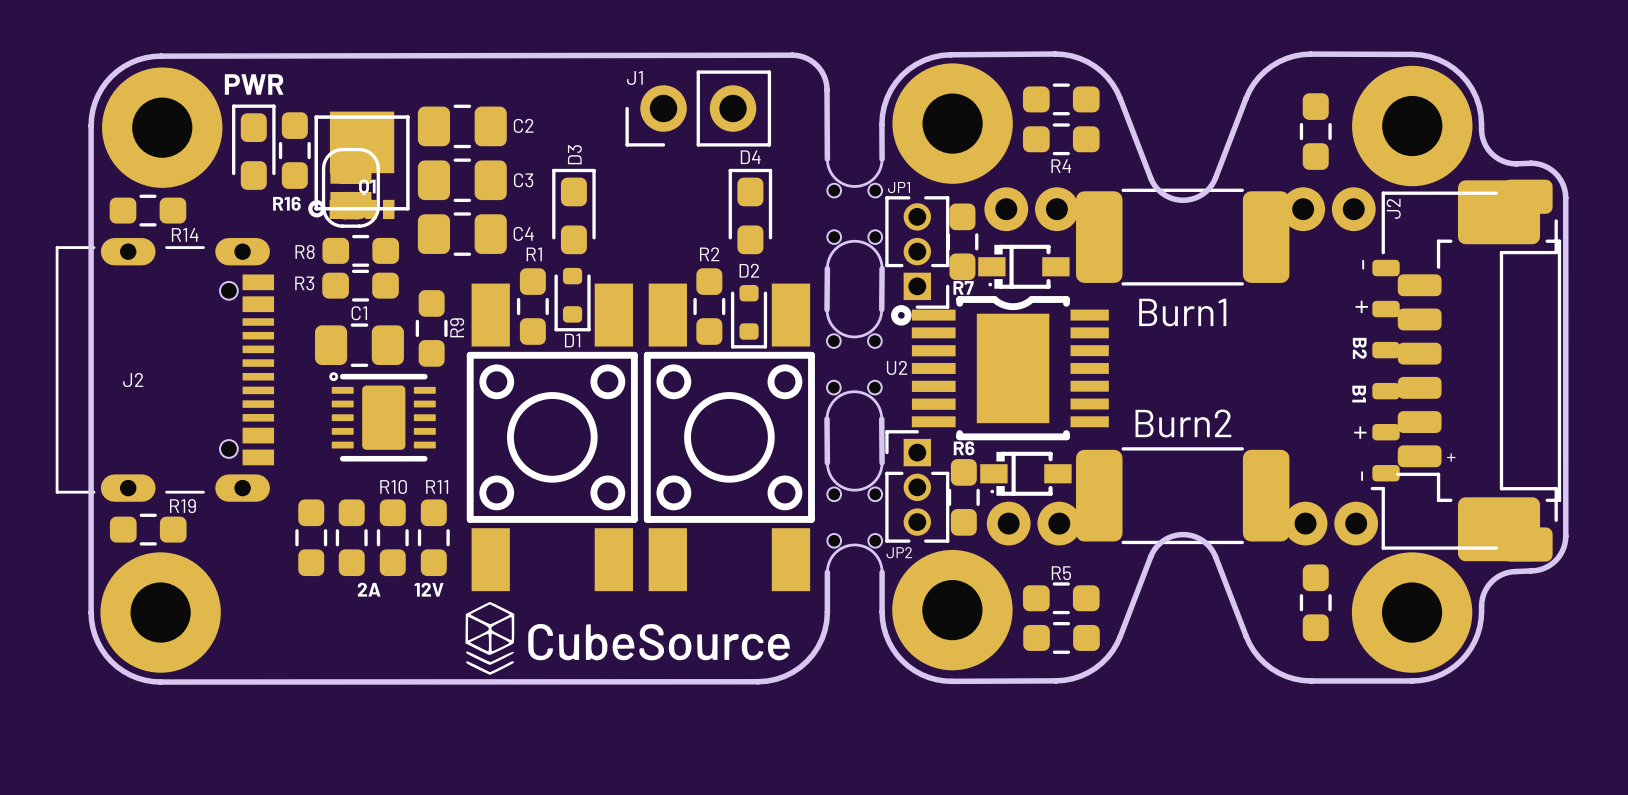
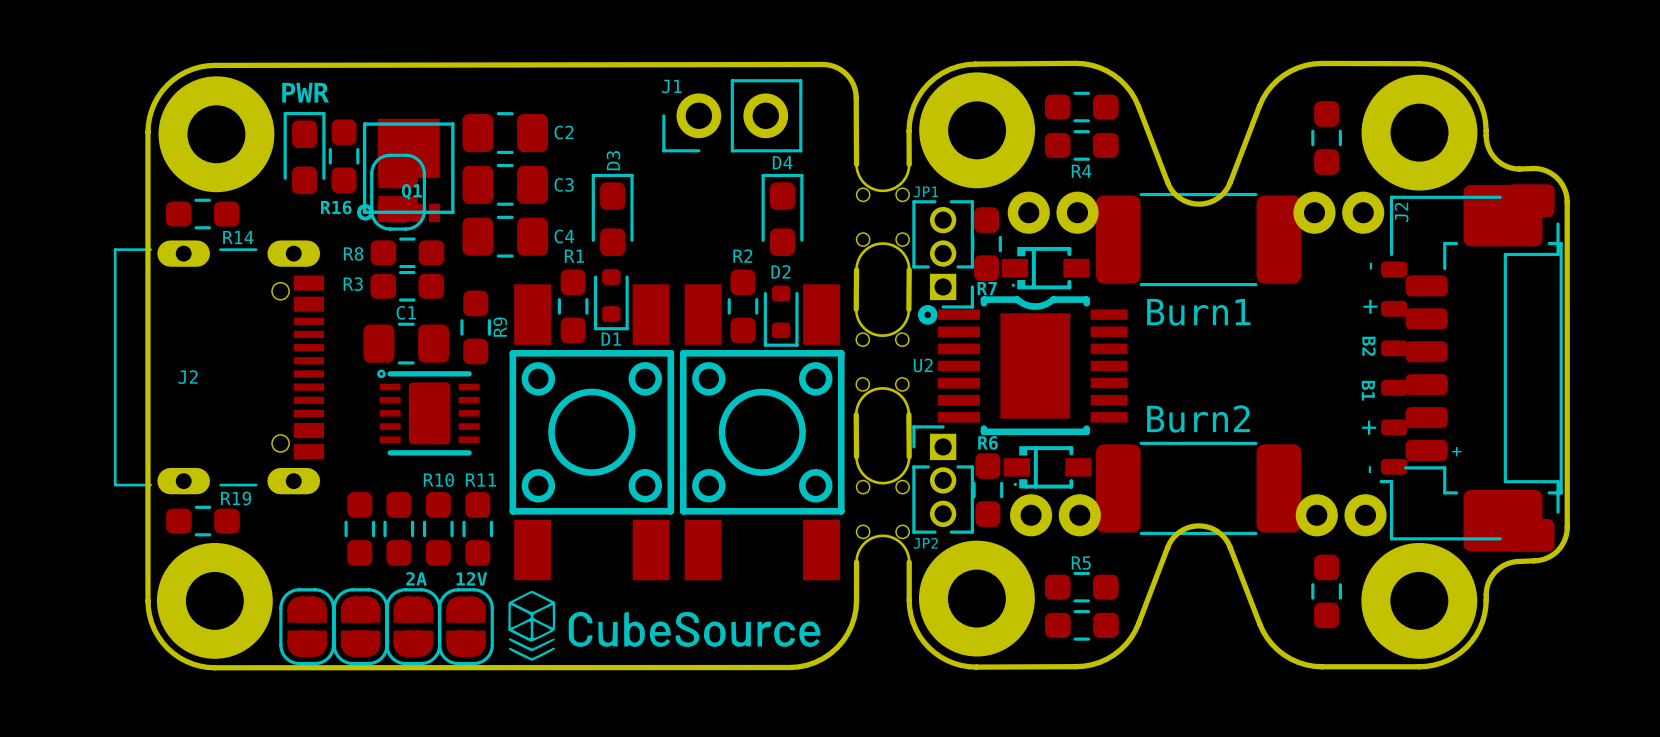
part: none -> (307, 626)
part: none -> (360, 626)
part: none -> (413, 626)
part: none -> (465, 626)

